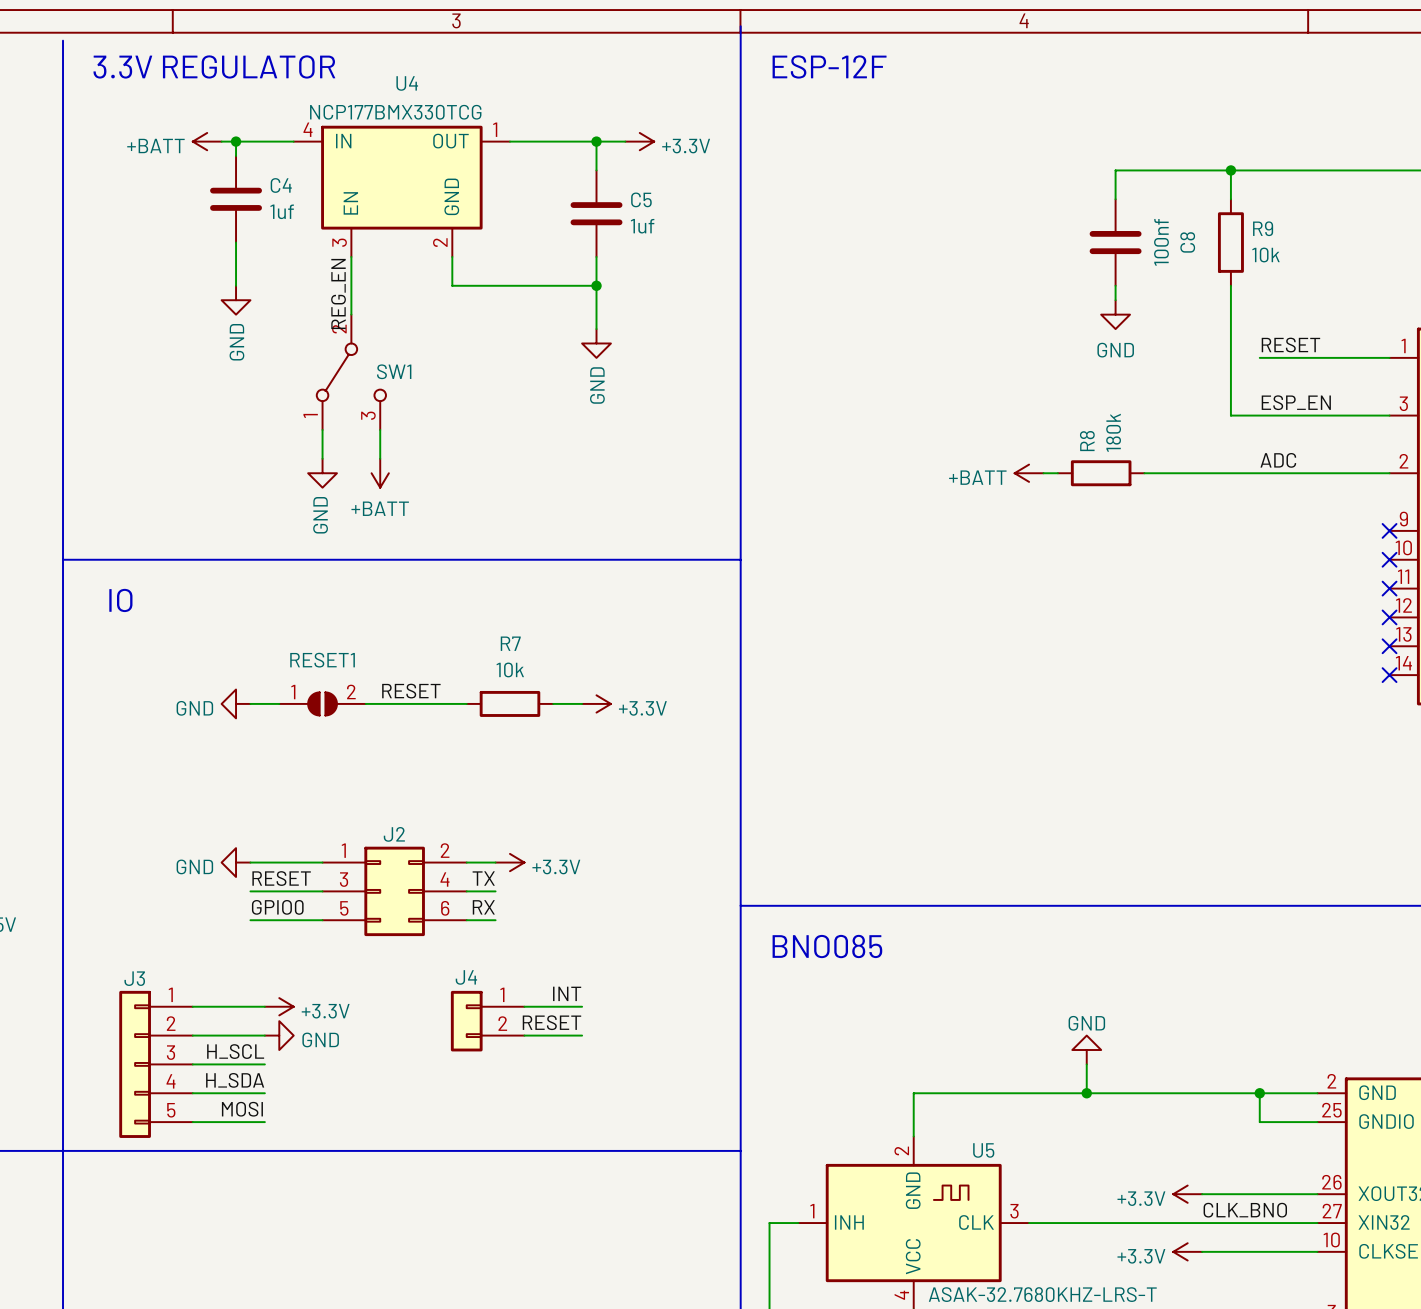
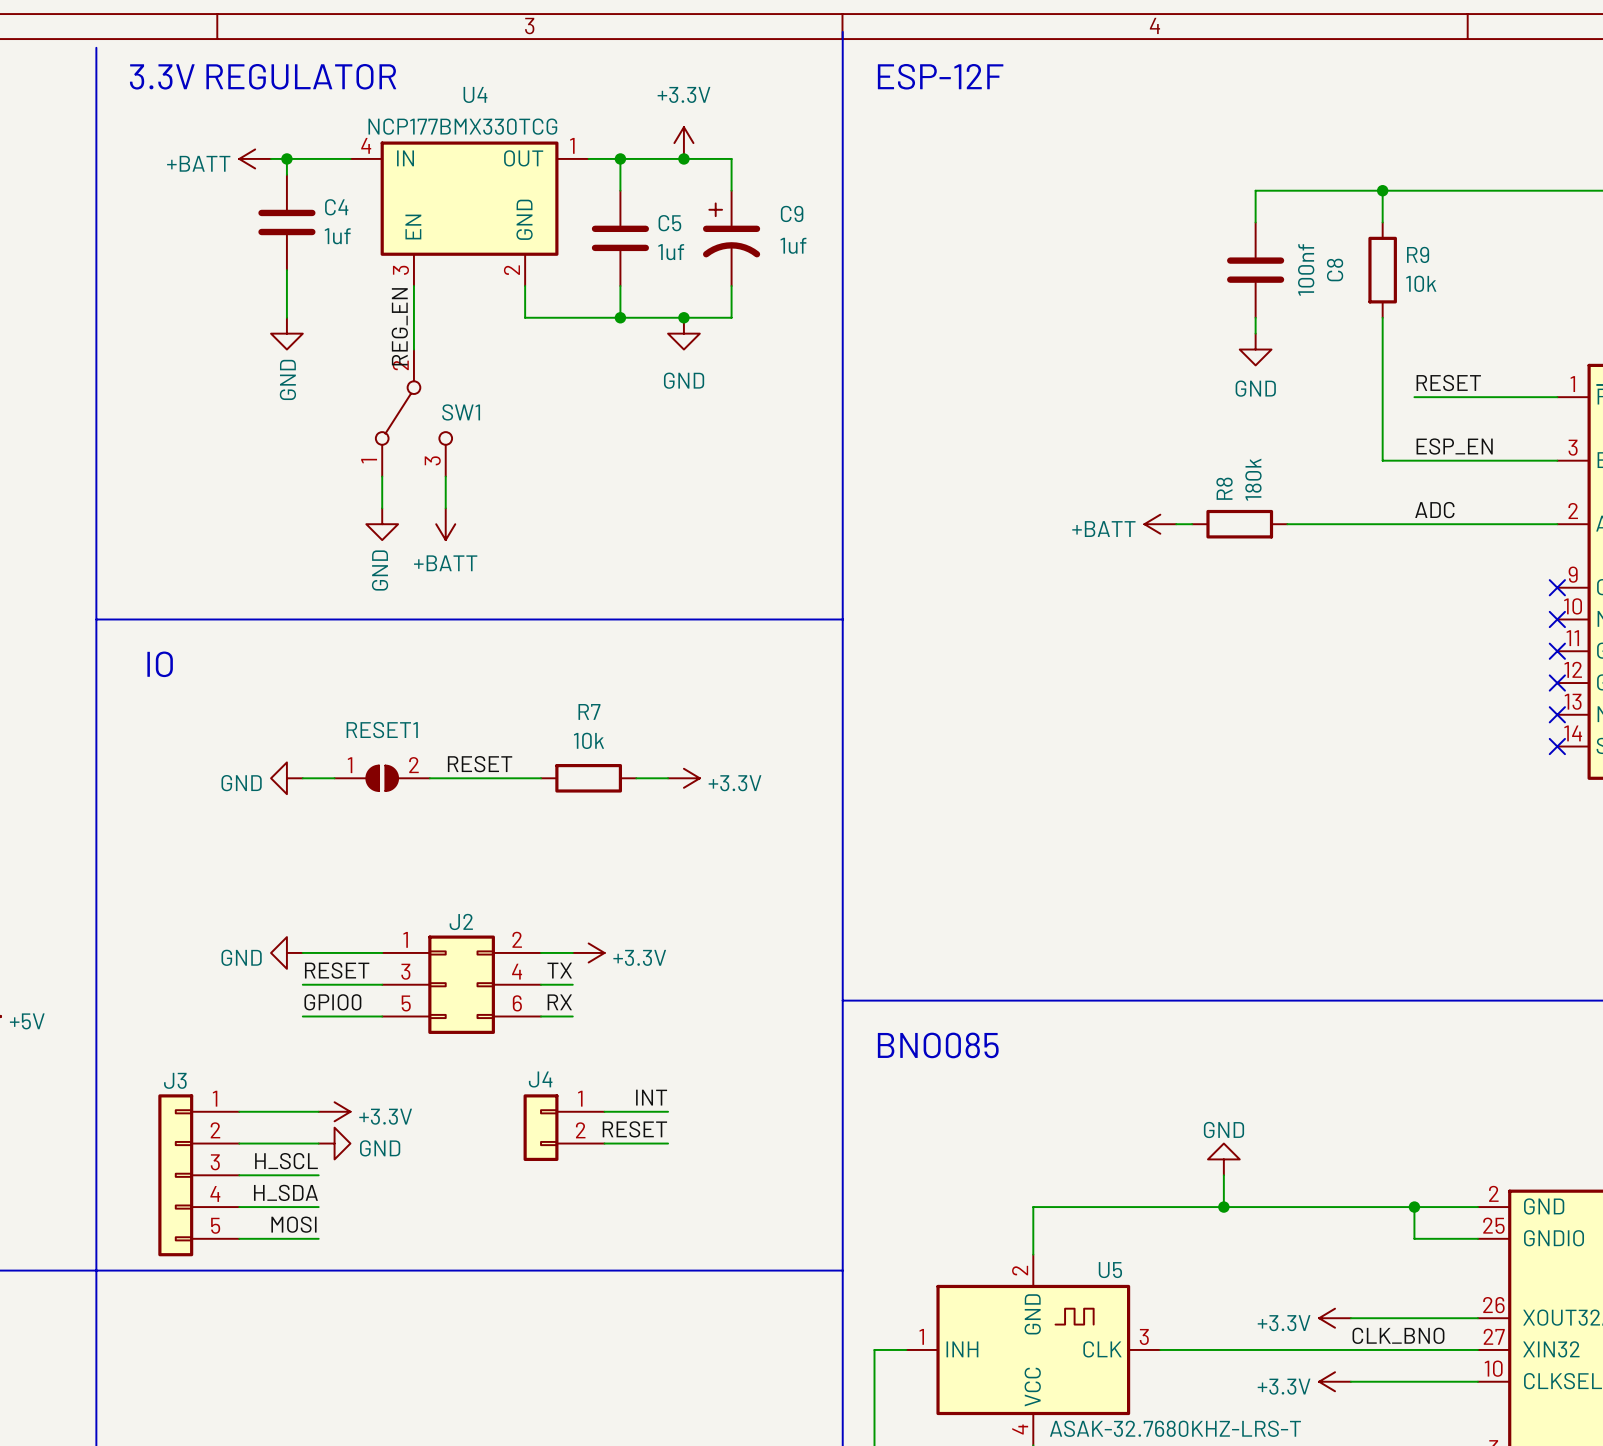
junction: none -> (620, 158)
wire: (596, 141) (596, 170) -> (620, 158) (620, 190)
wire: none -> (715, 158) (731, 158) (731, 190)
power symbol rotation: 0° (639, 141) -> 90° counterclockwise (683, 143)
power symbol position: +3.3V (639, 141) -> +3.3V (683, 143)
C5 position: (596, 213) -> (620, 238)
C9: none -> 1uf (731, 238)
wire: none -> (620, 286) (620, 317)
wire: (596, 256) (596, 329) -> none
wire: none -> (731, 286) (731, 317) (683, 317)
junction: none -> (620, 317)
power symbol position: GND (596, 343) -> GND (683, 333)
power symbol text rotation: 0° (597, 385) -> 90° clockwise (684, 380)

